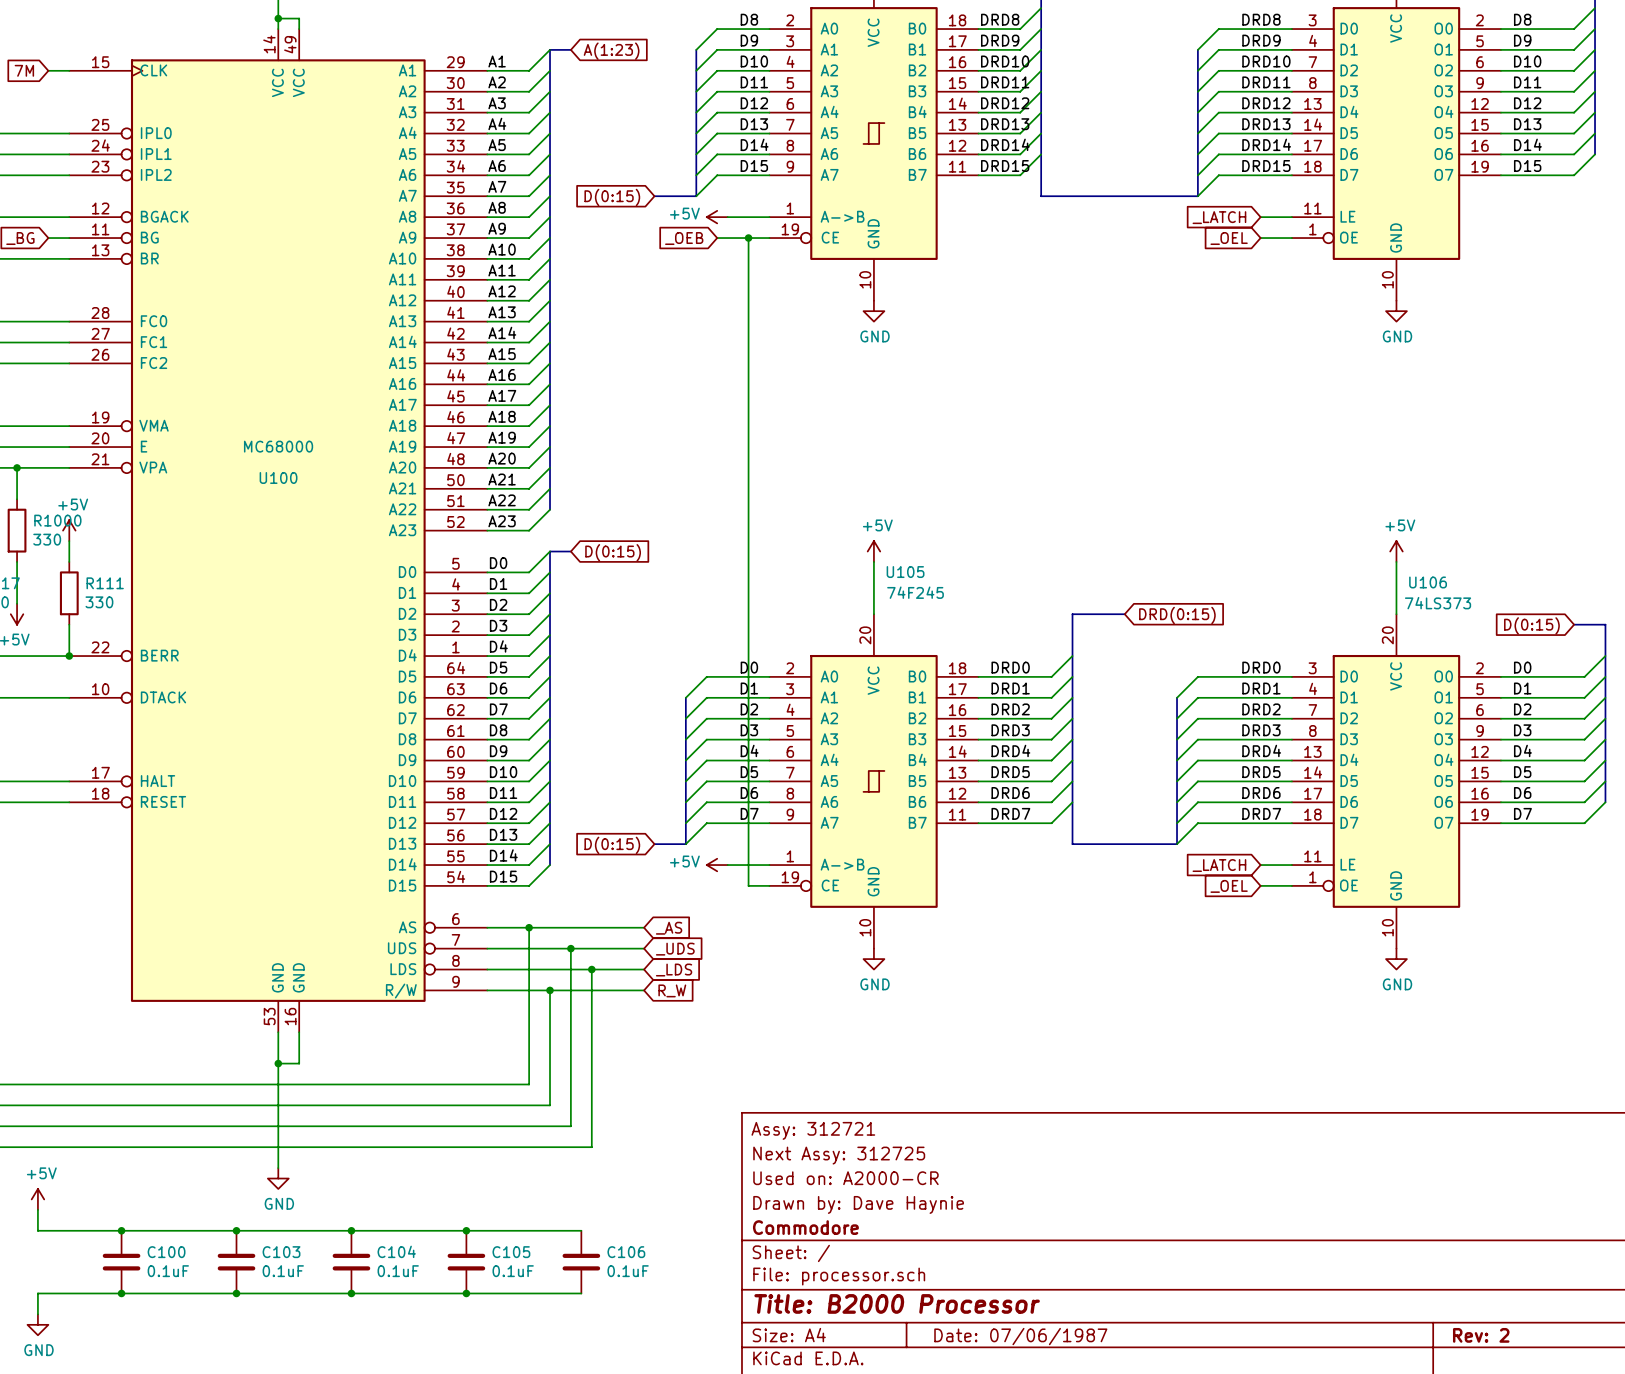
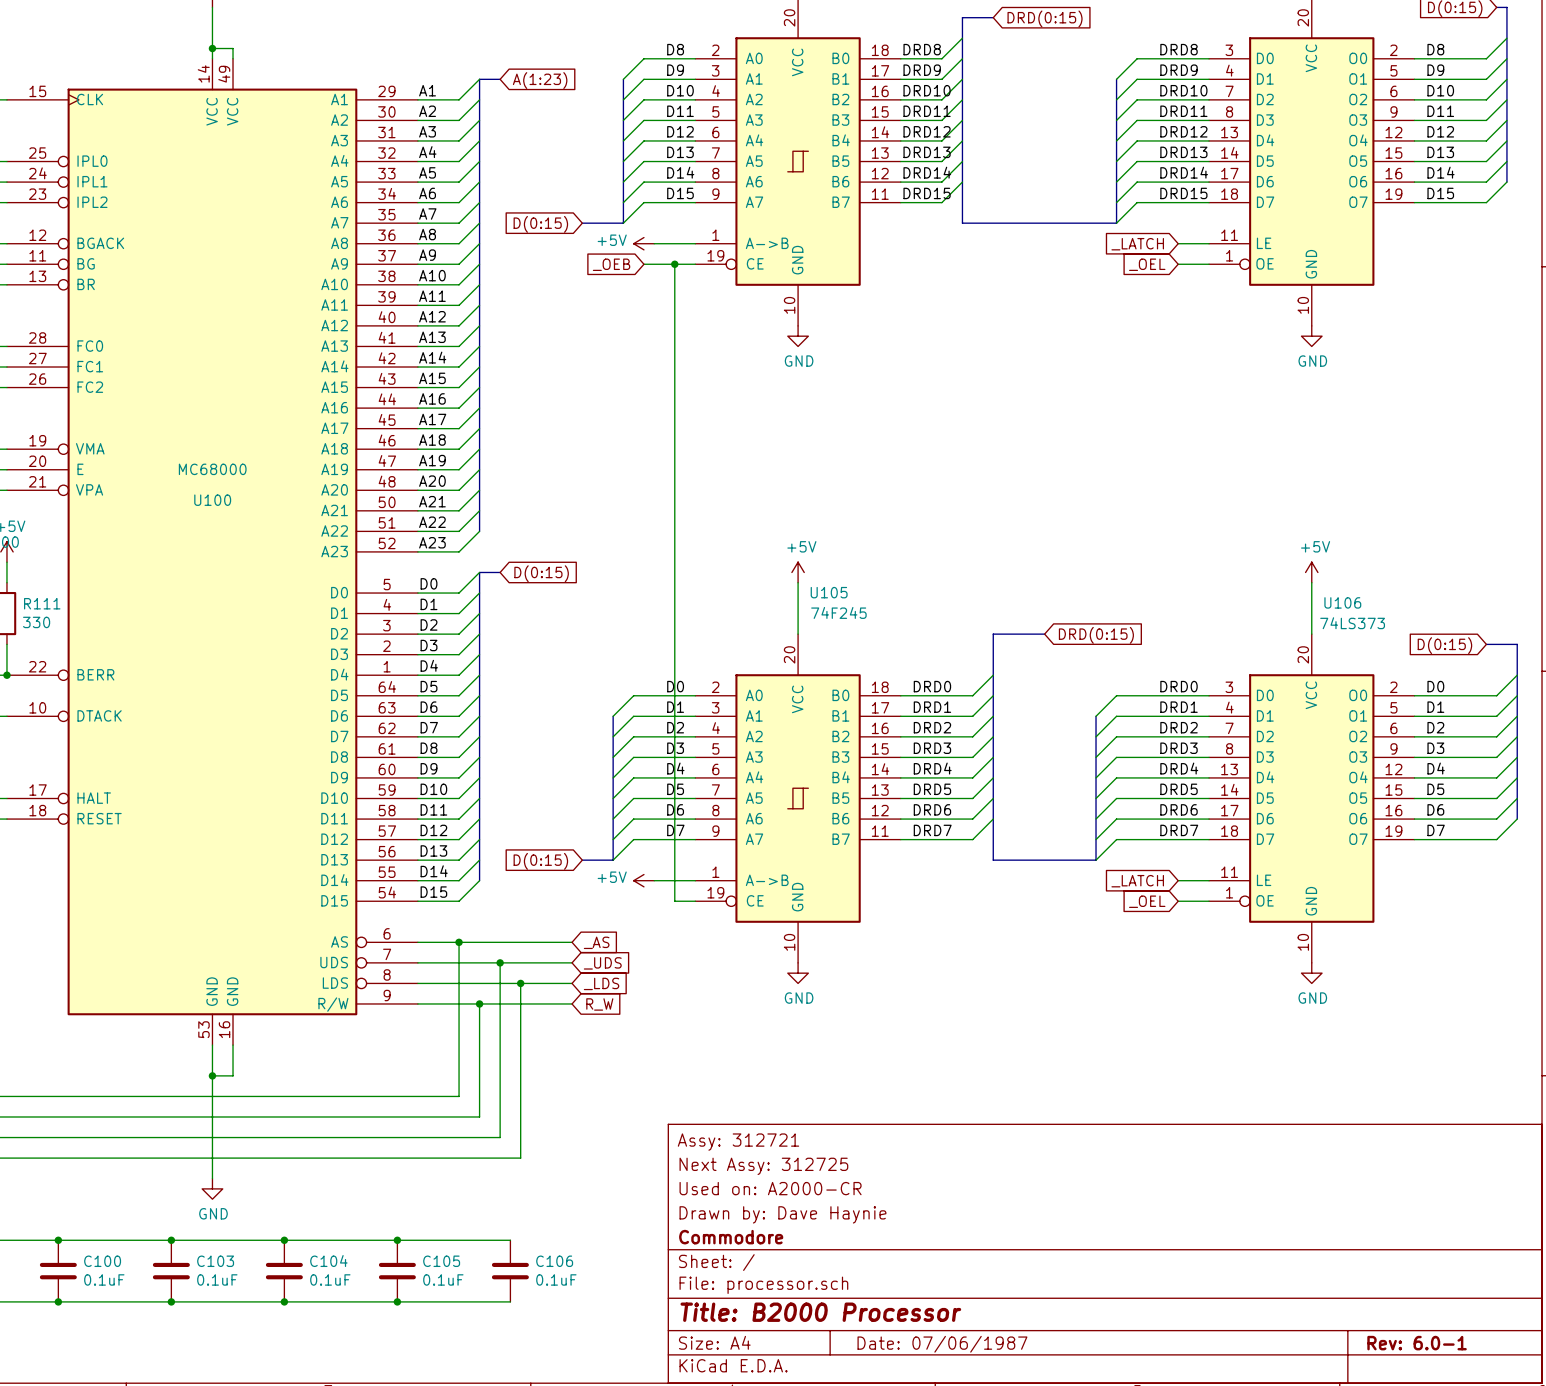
title block: Rev: 2 (1481, 1335) -> Rev: 6.0-1 (1417, 1343)

